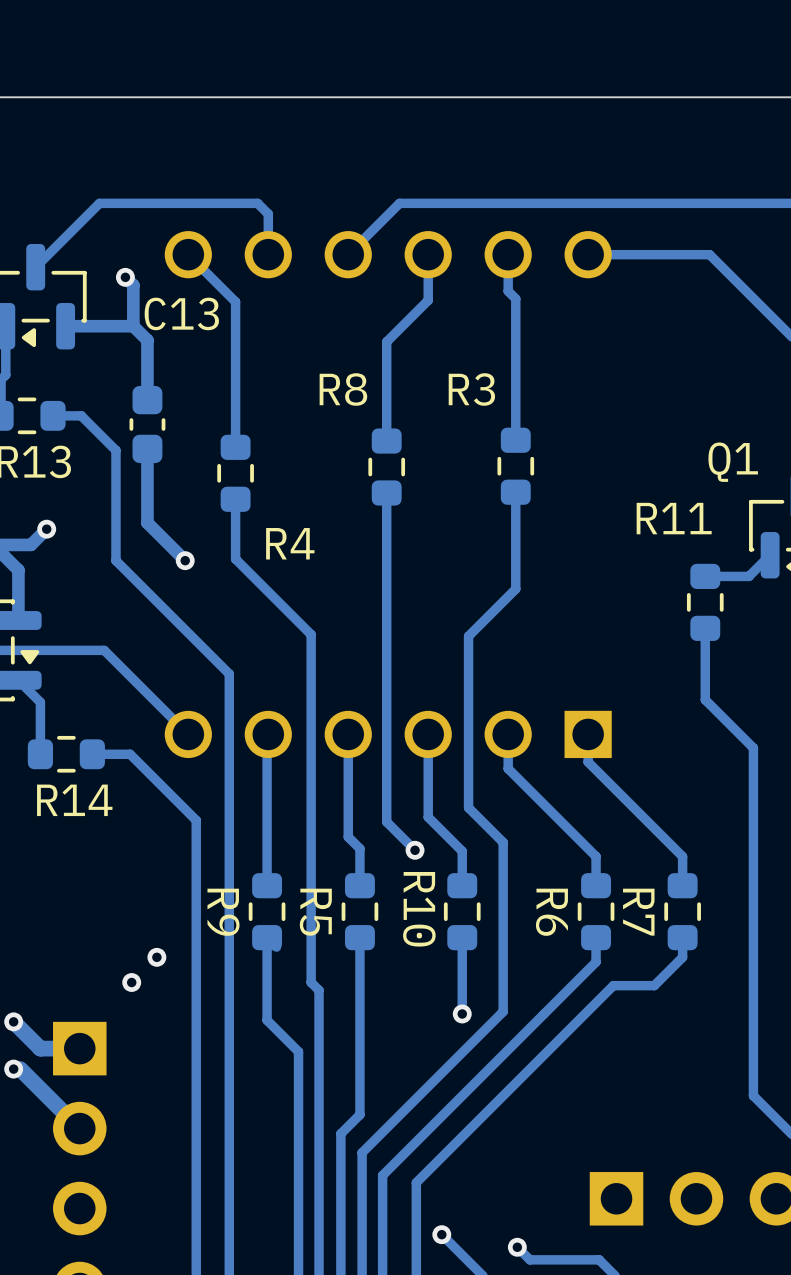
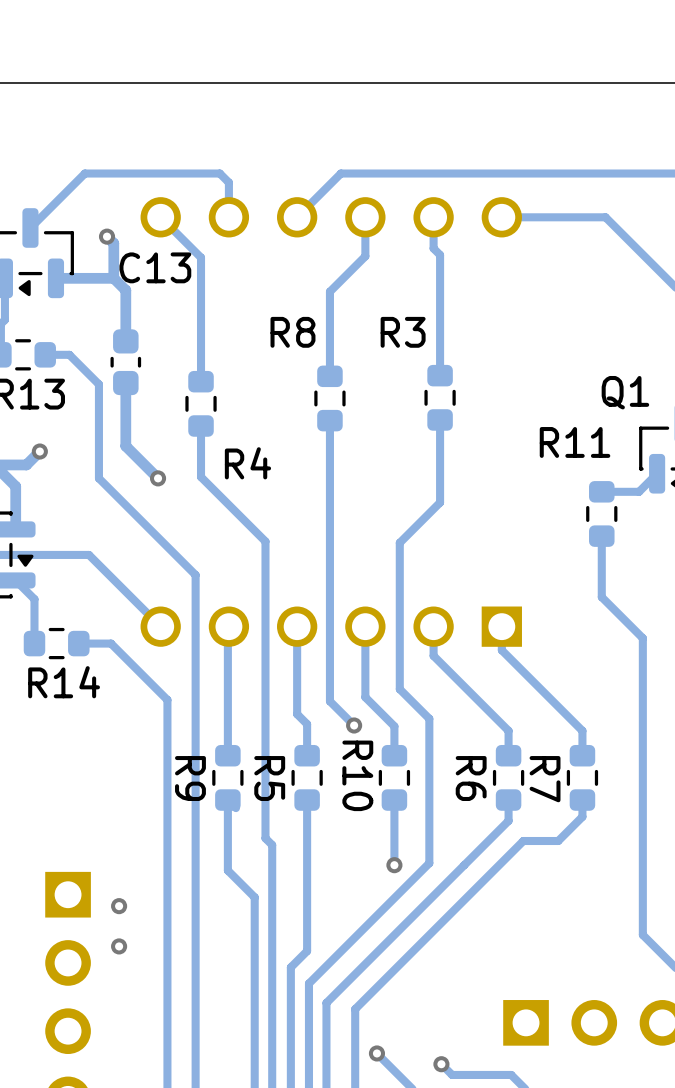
via: (156, 957) -> none
via: (131, 982) -> none
track: (13, 1021) (40, 1048) (79, 1048) -> none
via: (13, 1021) -> none
via: none -> (119, 906)
track: (13, 1069) (20, 1069) (79, 1128) -> none
via: (13, 1069) -> none
via: none -> (119, 946)

